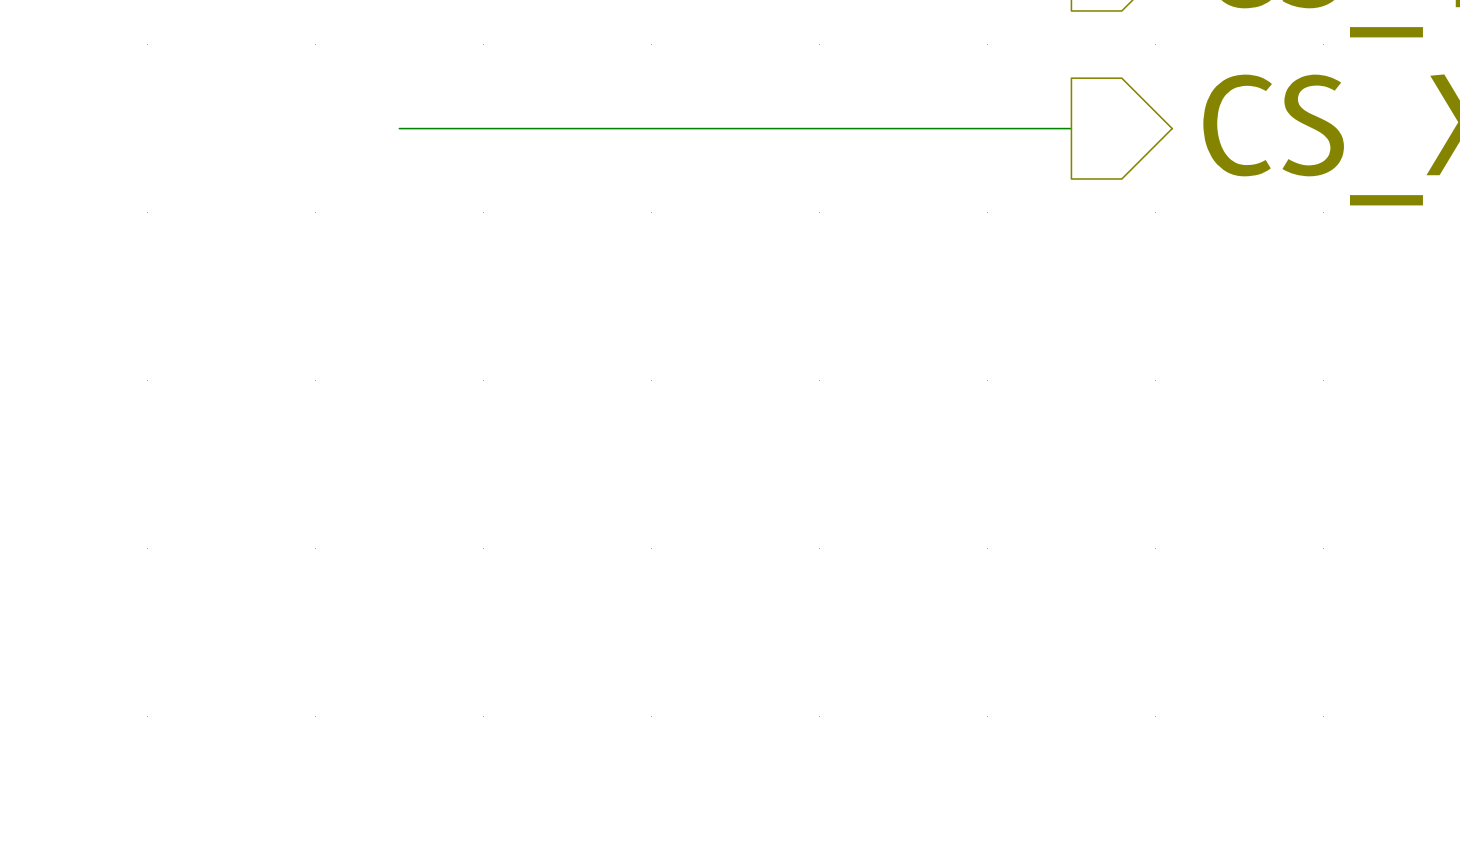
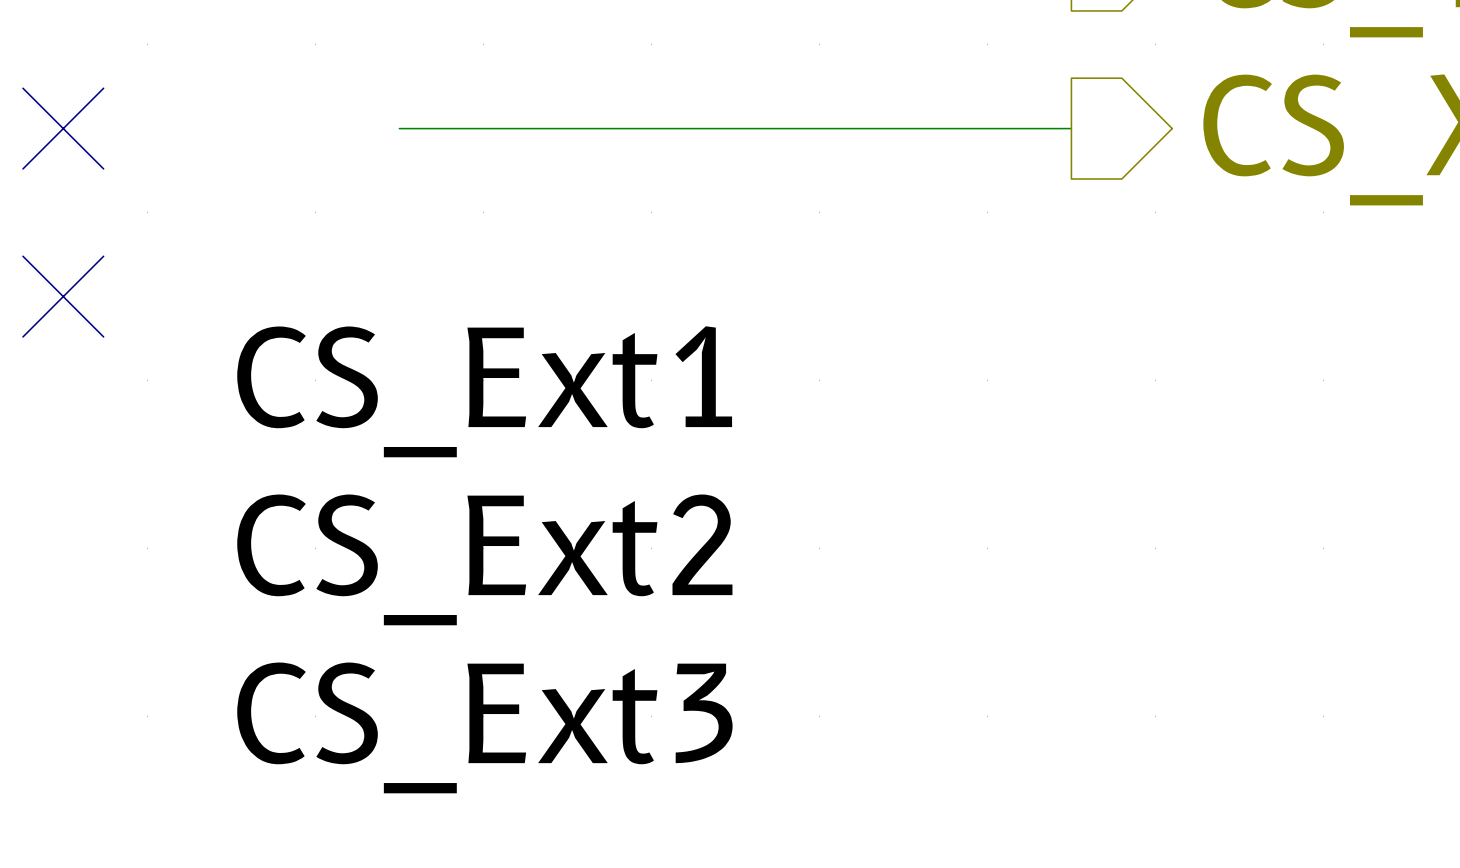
no-connect mark: none -> (63, 128)
no-connect mark: none -> (63, 296)
label: none -> CS_Ext1 (484, 391)
label: none -> CS_Ext2 (484, 559)
label: none -> CS_Ext3 (484, 727)

